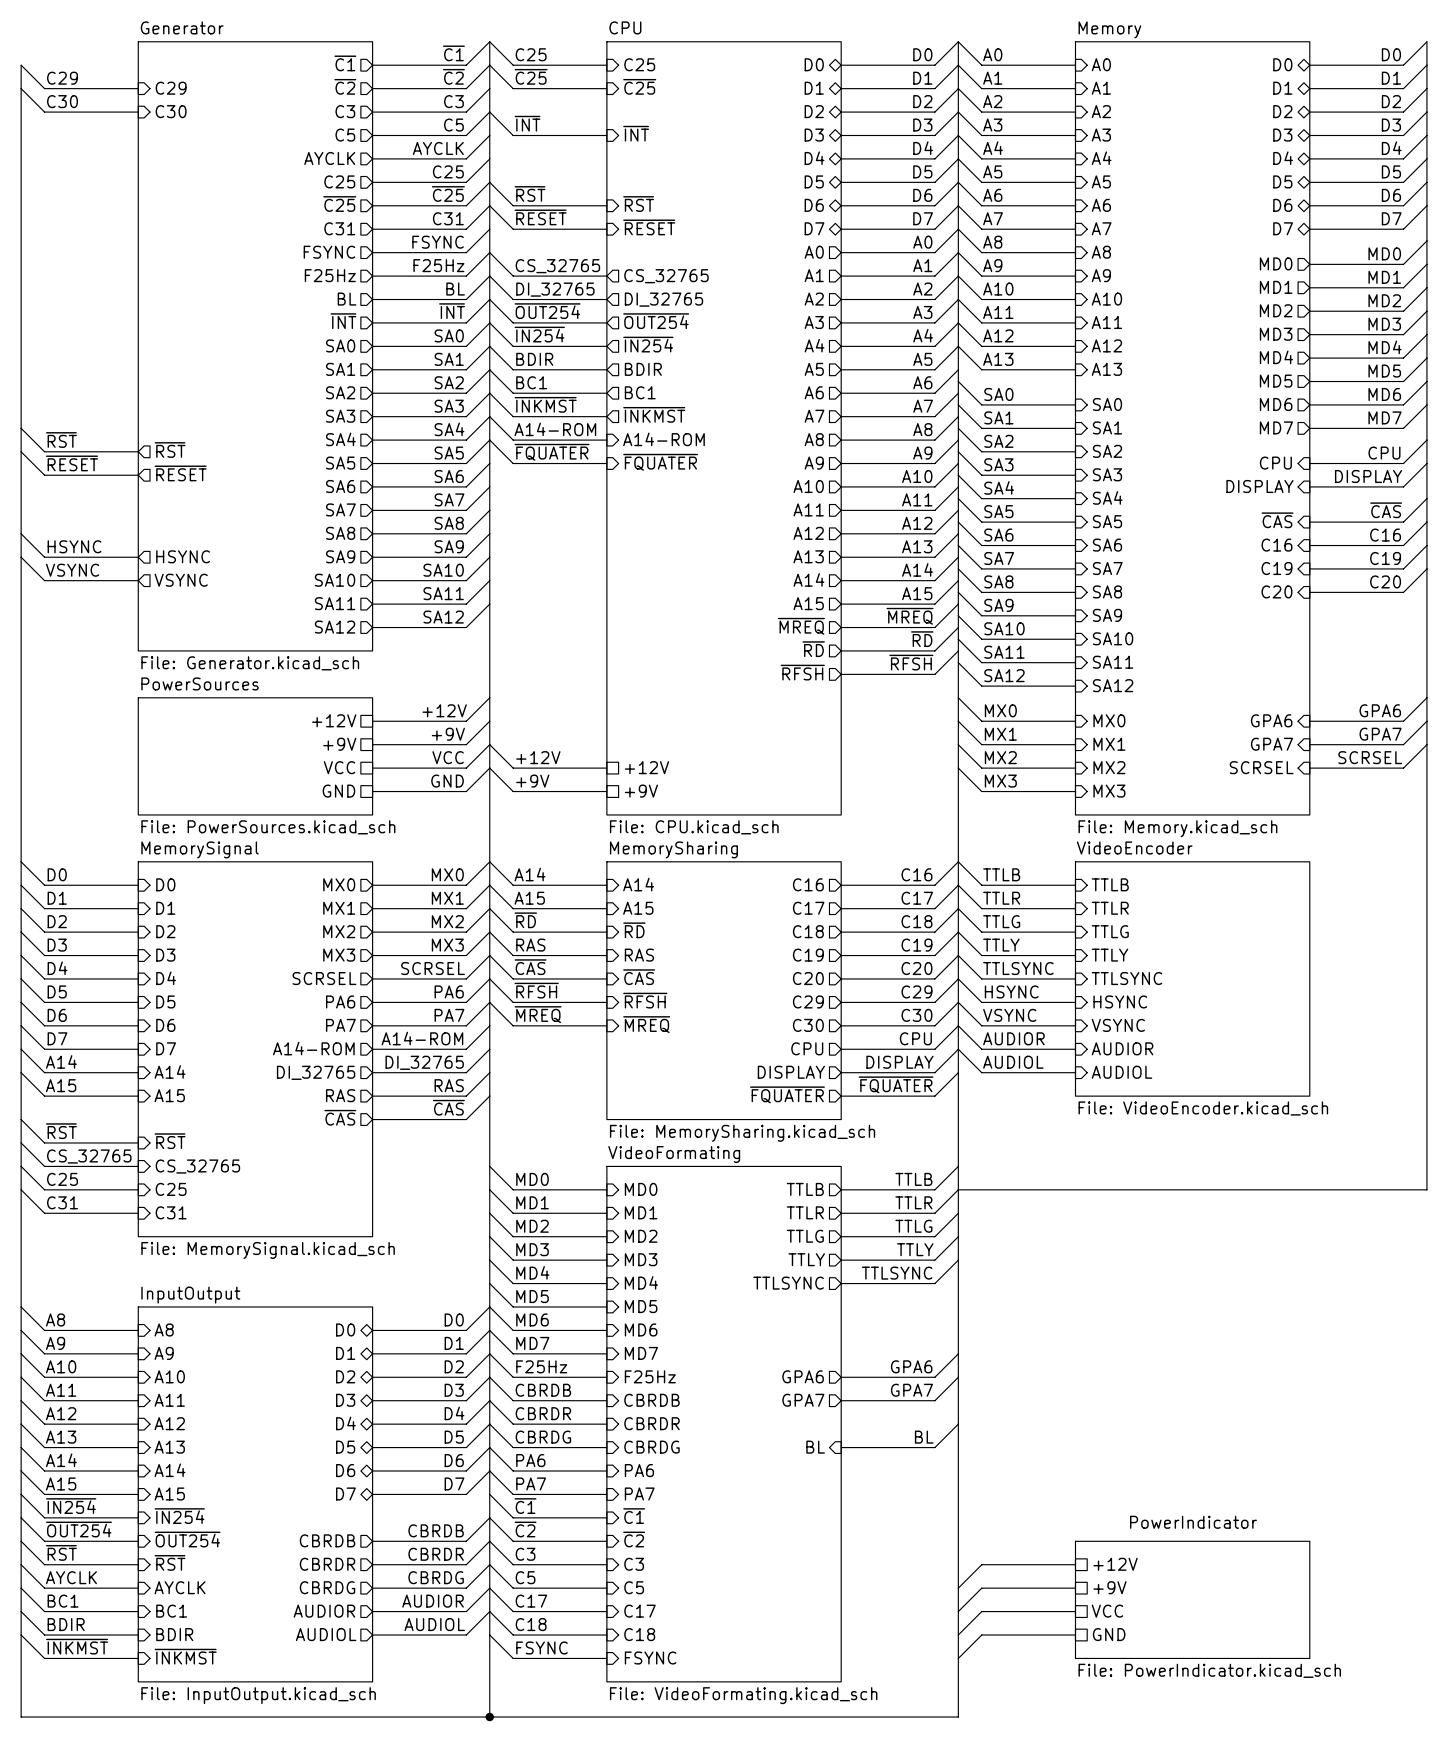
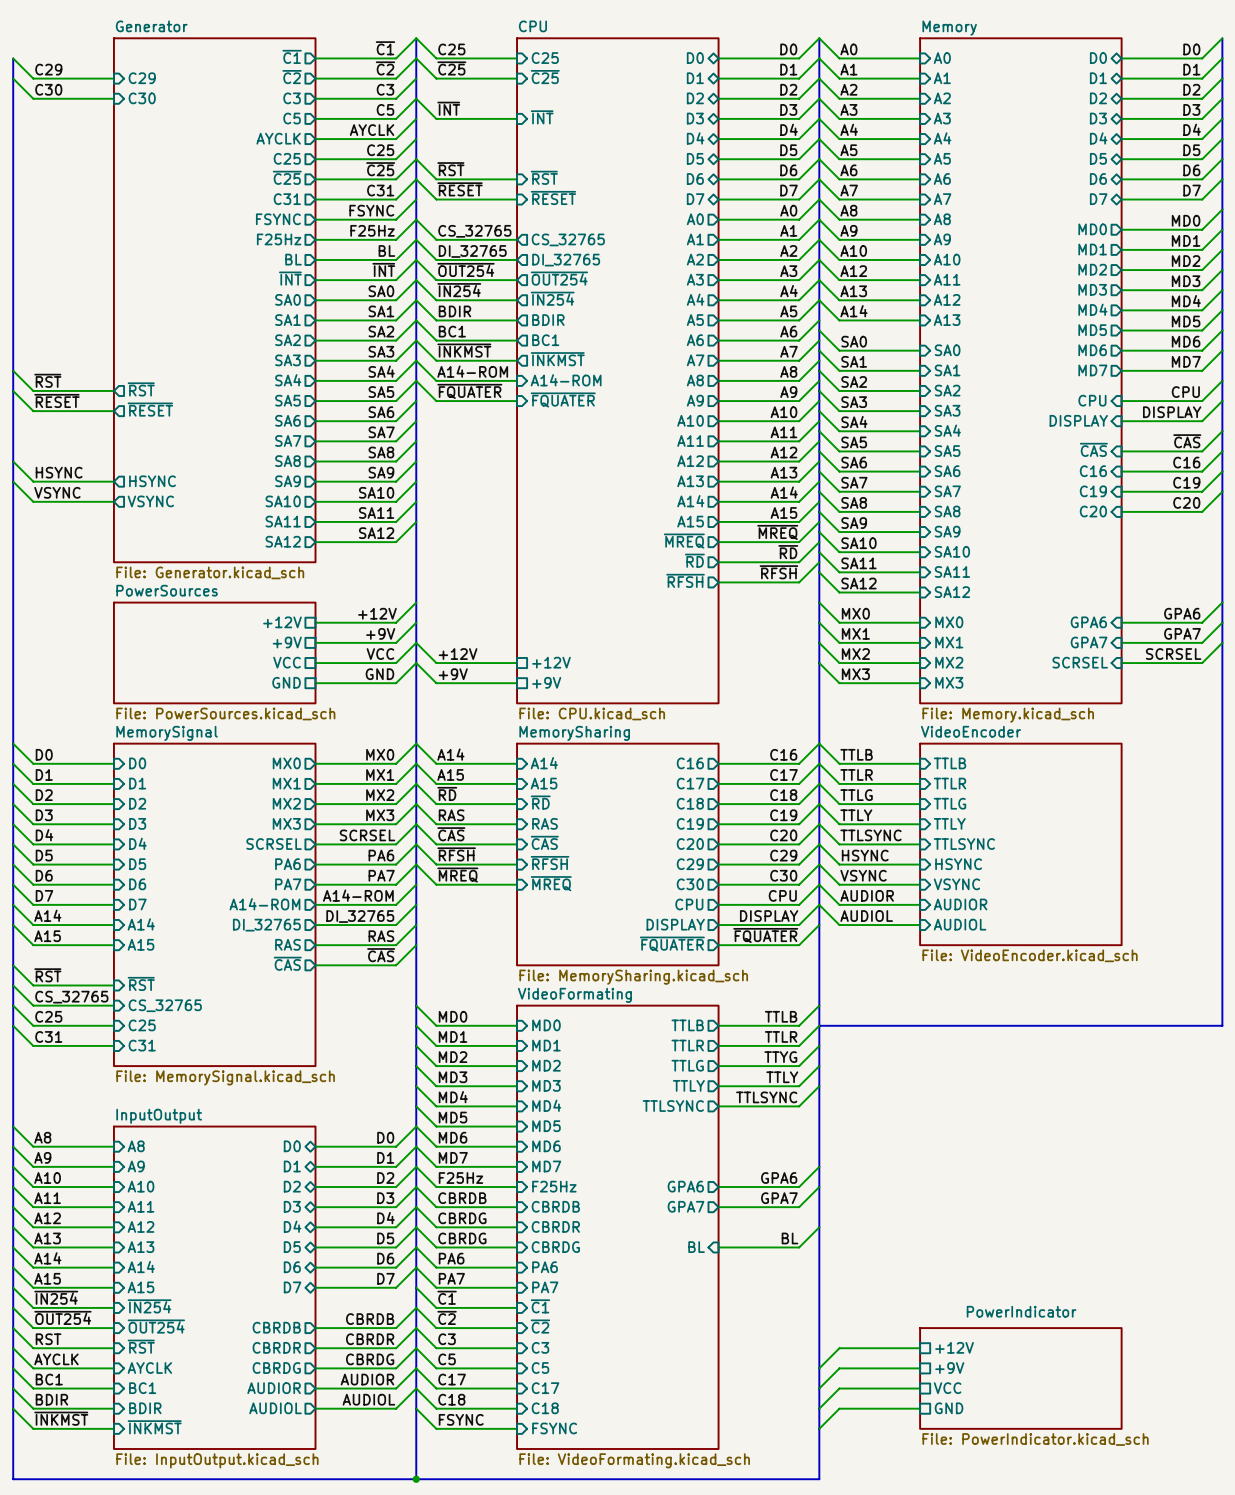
label: A11 (998, 312) -> A12 (853, 271)
label: A12 (998, 335) -> A13 (853, 291)
label: A13 (998, 359) -> A14 (853, 311)
label: TTLG (913, 1226) -> TTYG (780, 1057)
label: CBRDR (543, 1413) -> CBRDG (462, 1218)
label: ~{RST} (61, 1552) -> RST (48, 1339)

